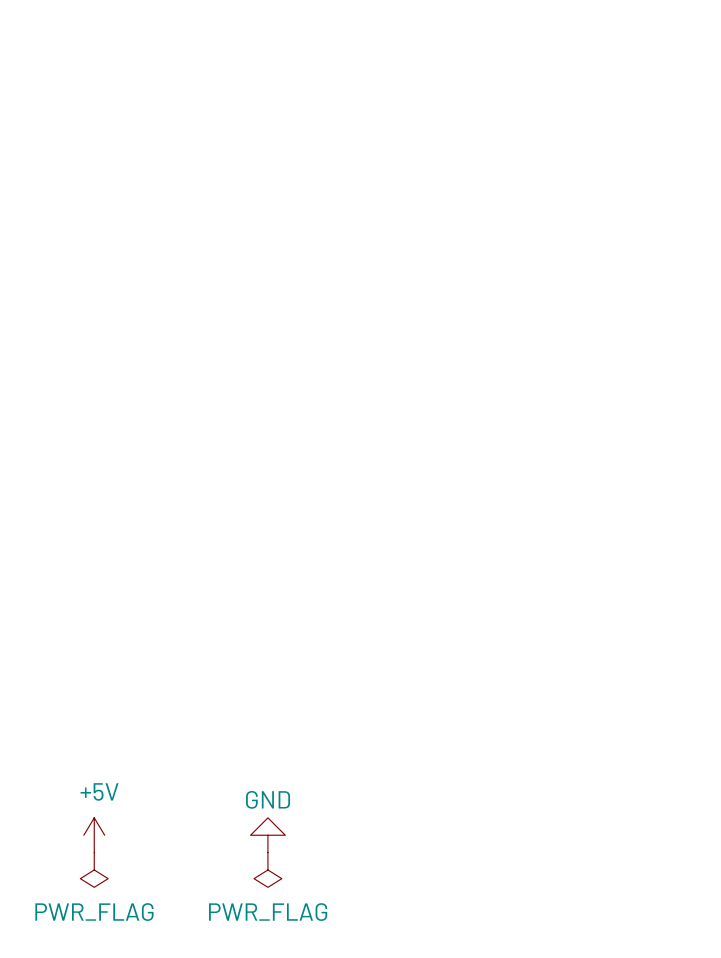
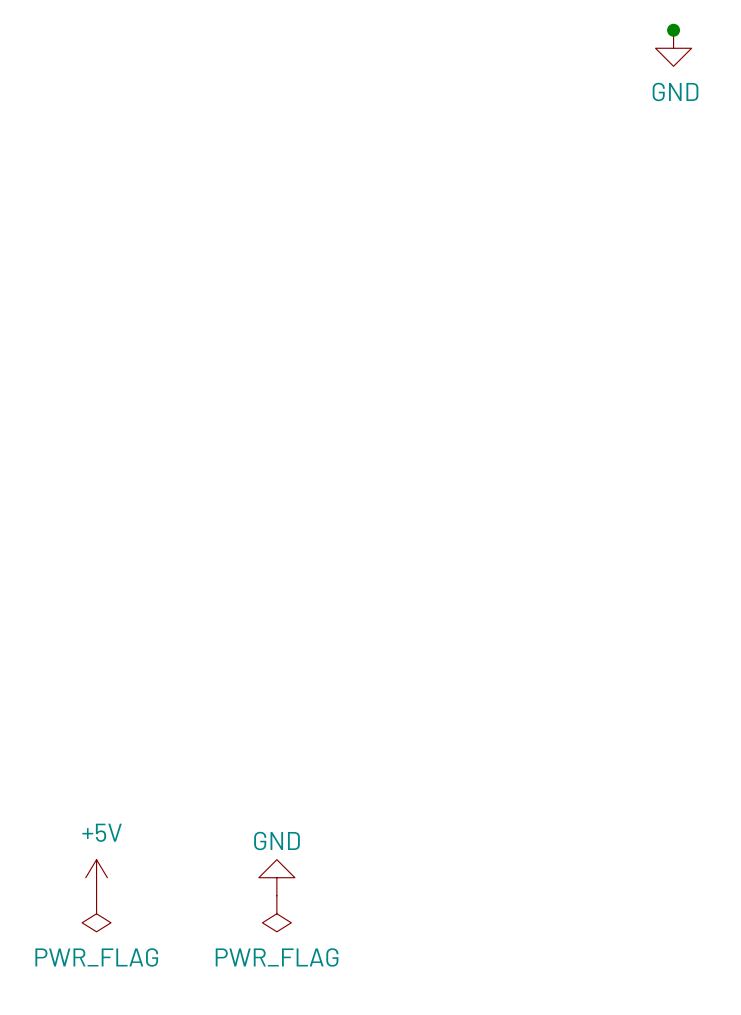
junction: none -> (673, 30)
power symbol: none -> GND (673, 48)

